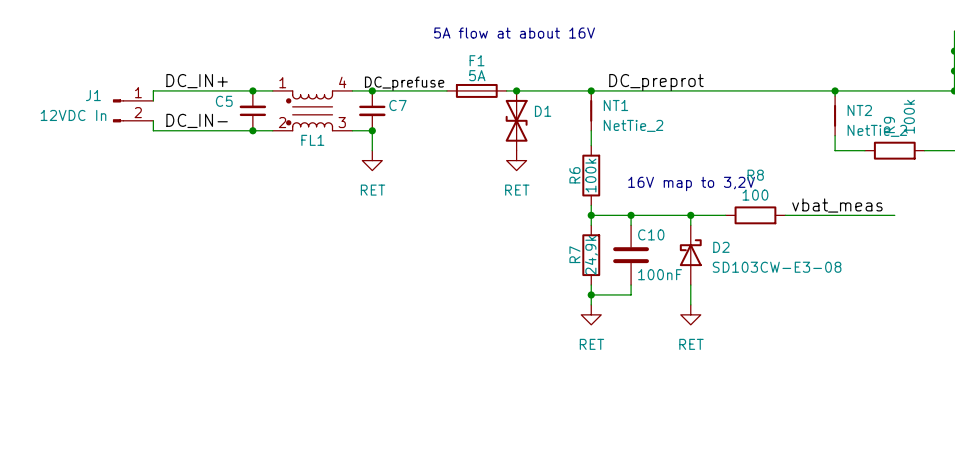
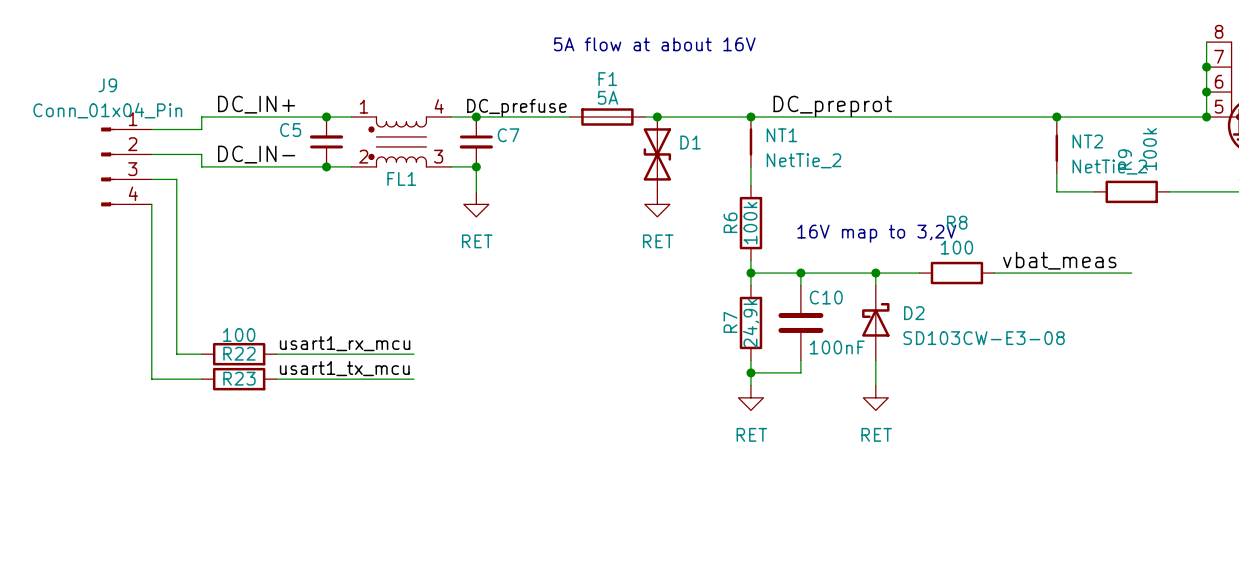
J1: 12VDC In (133, 110) -> none
J9: none -> Conn_01x04_Pin (126, 166)
wire: none -> (151, 179) (176, 179) (176, 354) (201, 354)
wire: none -> (151, 204) (151, 379) (201, 379)
label: none -> usart1_rx_mcu (345, 343)
R22: none -> 100 (239, 354)
wire: none -> (276, 354) (413, 354)
label: none -> usart1_tx_mcu (344, 368)
R23: none -> (239, 379)
wire: none -> (276, 379) (413, 379)

